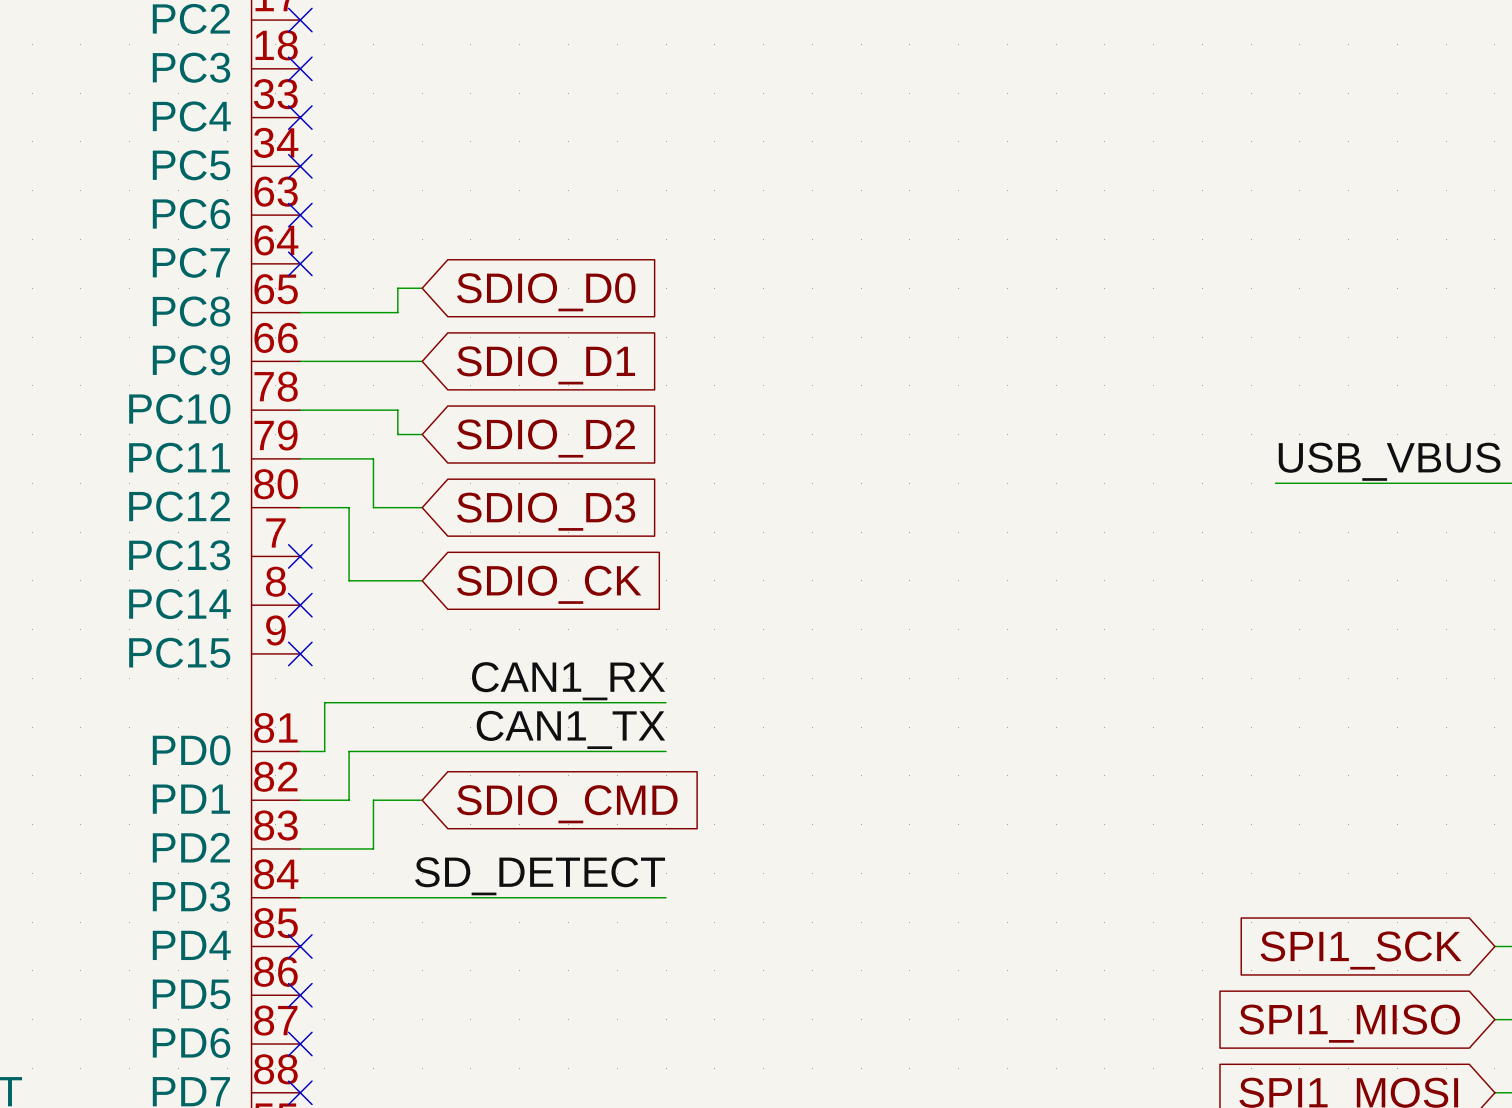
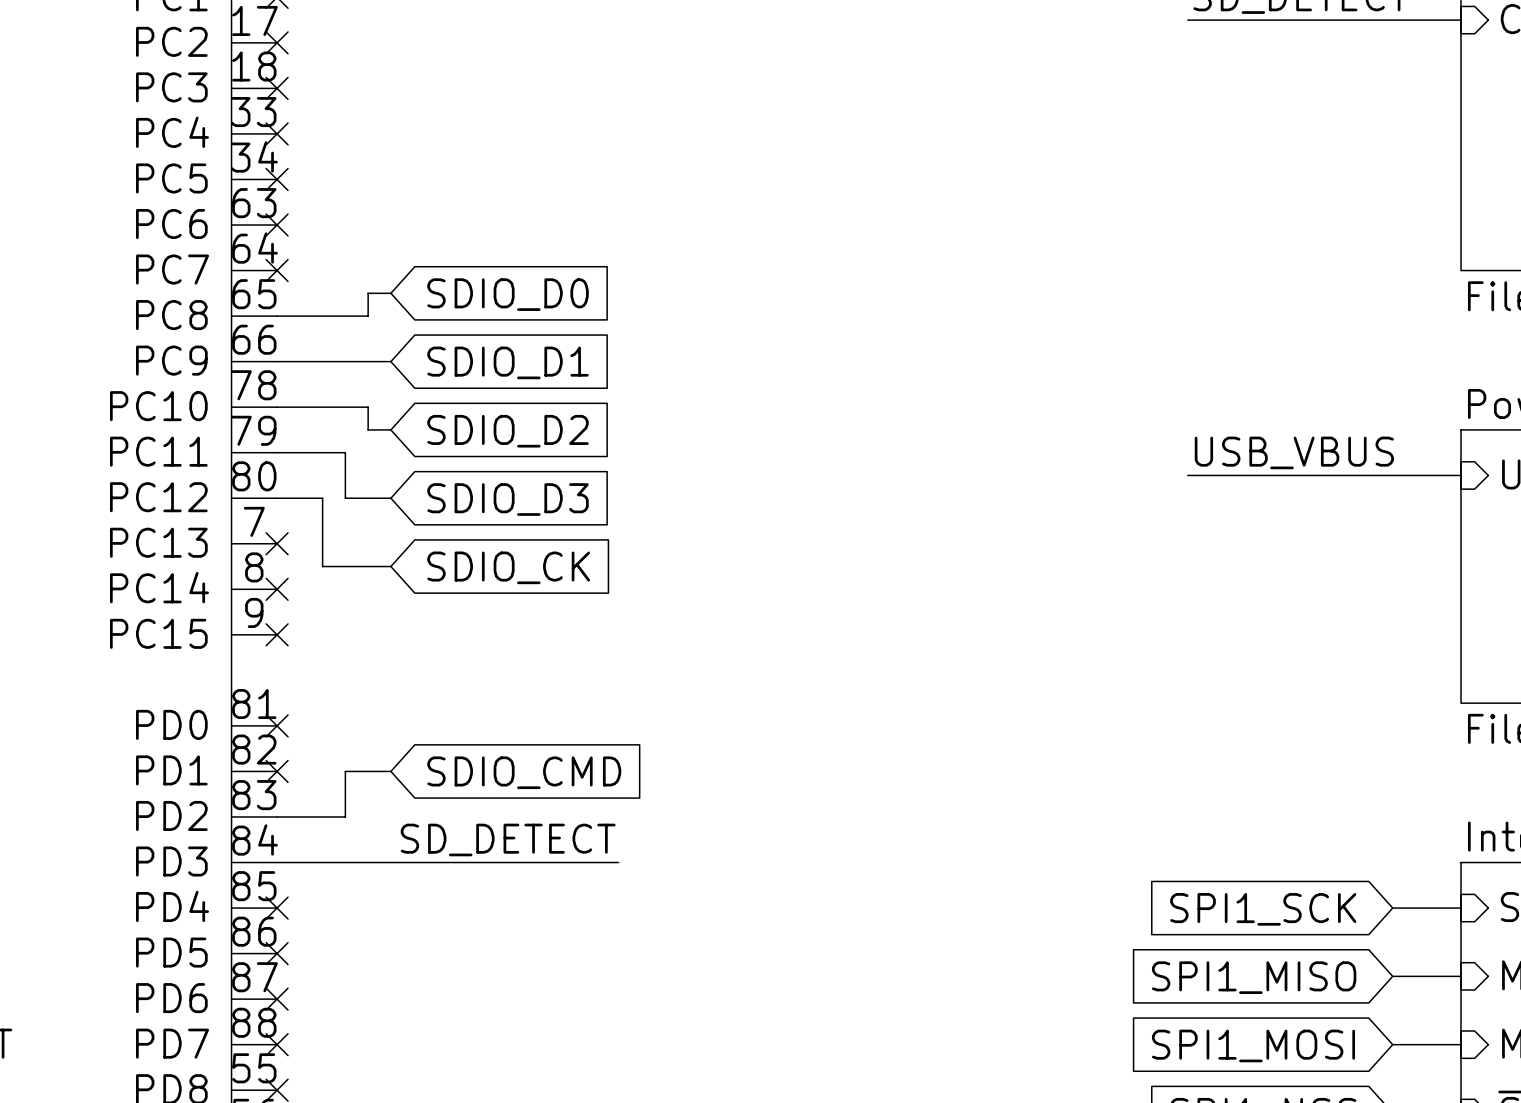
label: CAN1_RX (568, 681) -> none
wire: (666, 702) (324, 702) (324, 751) (300, 751) -> none
label: CAN1_TX (570, 729) -> none
no-connect mark: none -> (277, 725)
wire: (666, 751) (349, 751) (349, 800) (300, 800) -> none
no-connect mark: none -> (277, 771)

